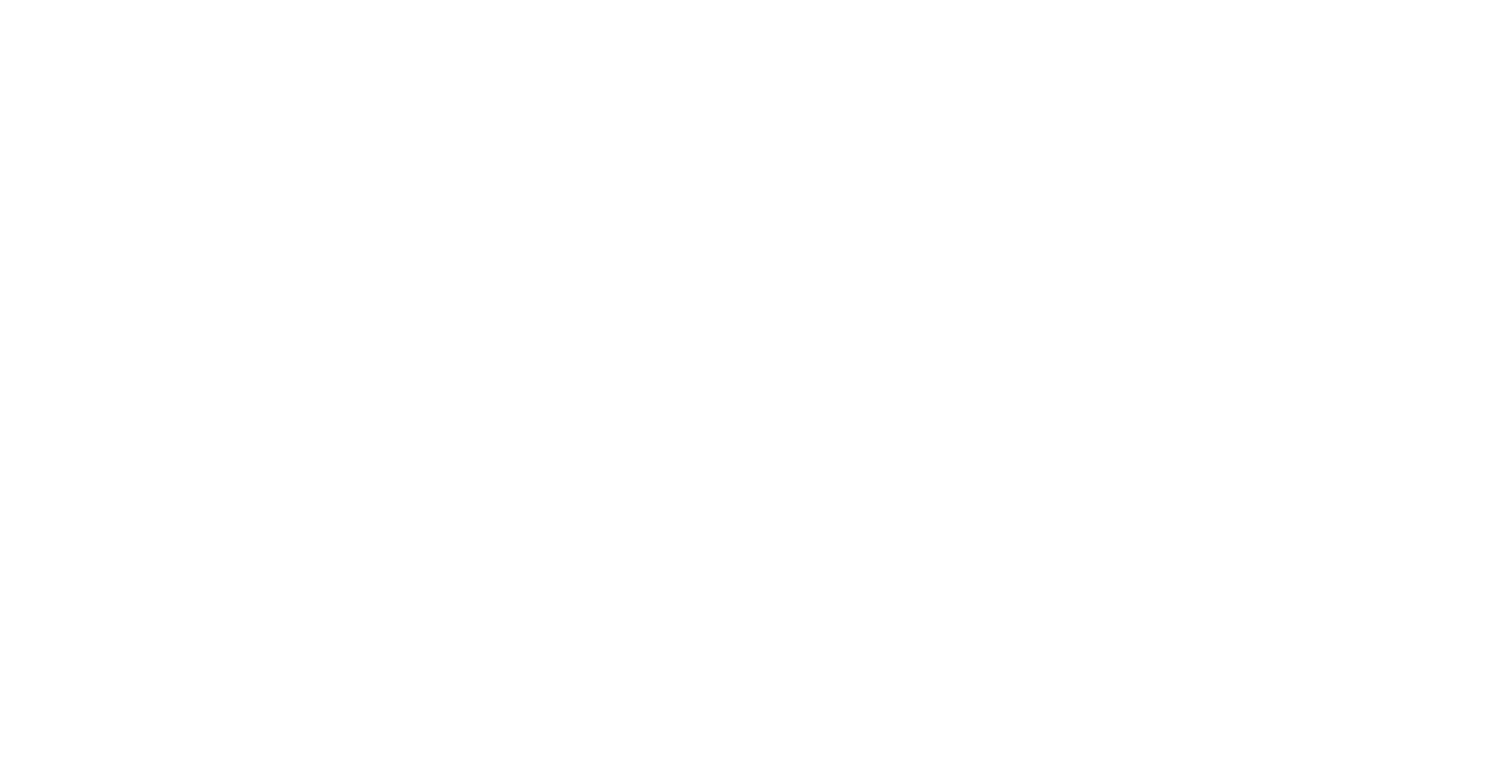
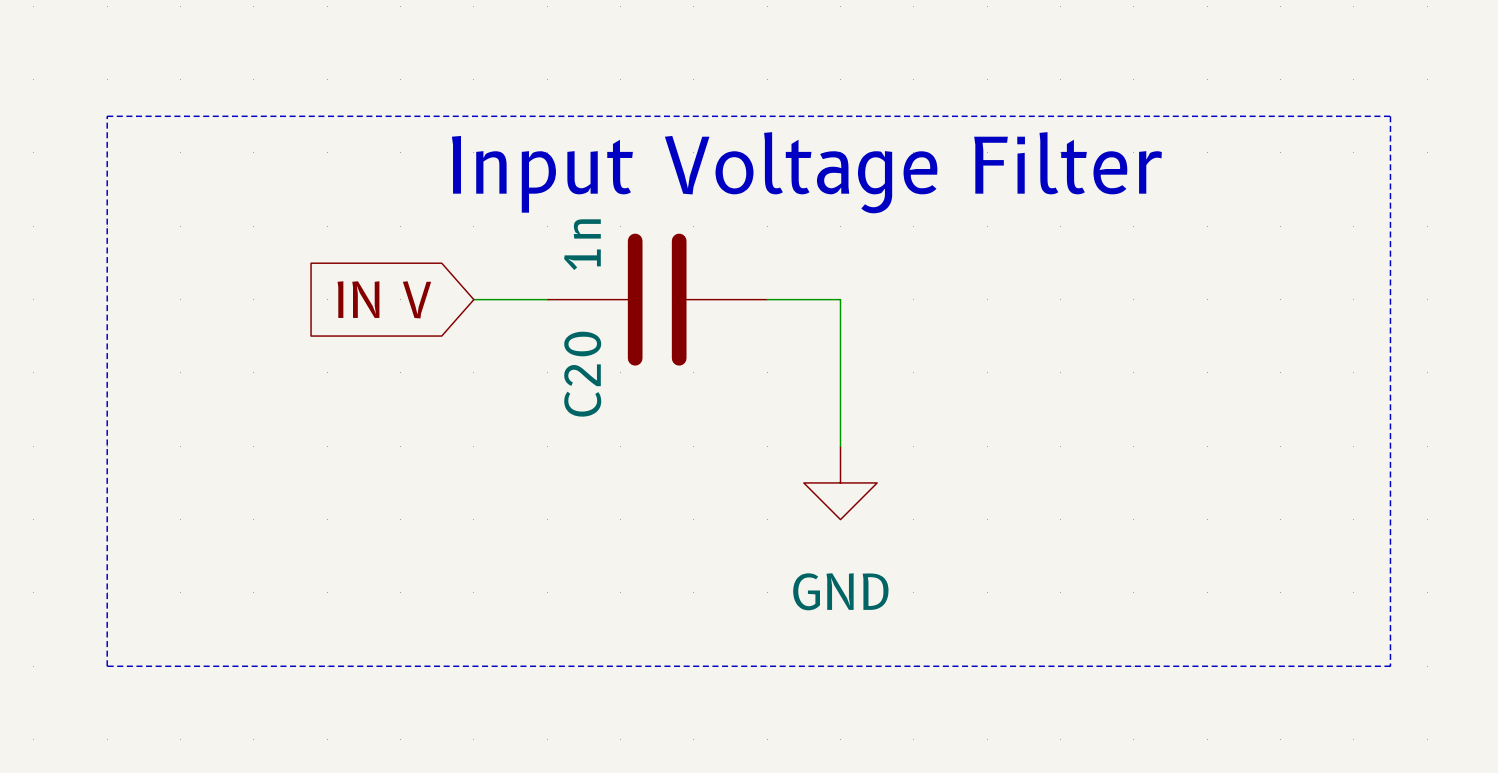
line: none -> (107, 116) (1390, 116) (1390, 666) (107, 666) (107, 116)
text: none -> Input Voltage Filter (806, 172)
global label: none -> IN V (384, 299)
wire: none -> (473, 299) (547, 299)
C20: none -> 1n (657, 299)
wire: none -> (767, 299) (840, 299) (840, 446)
power symbol: none -> GND (840, 482)

